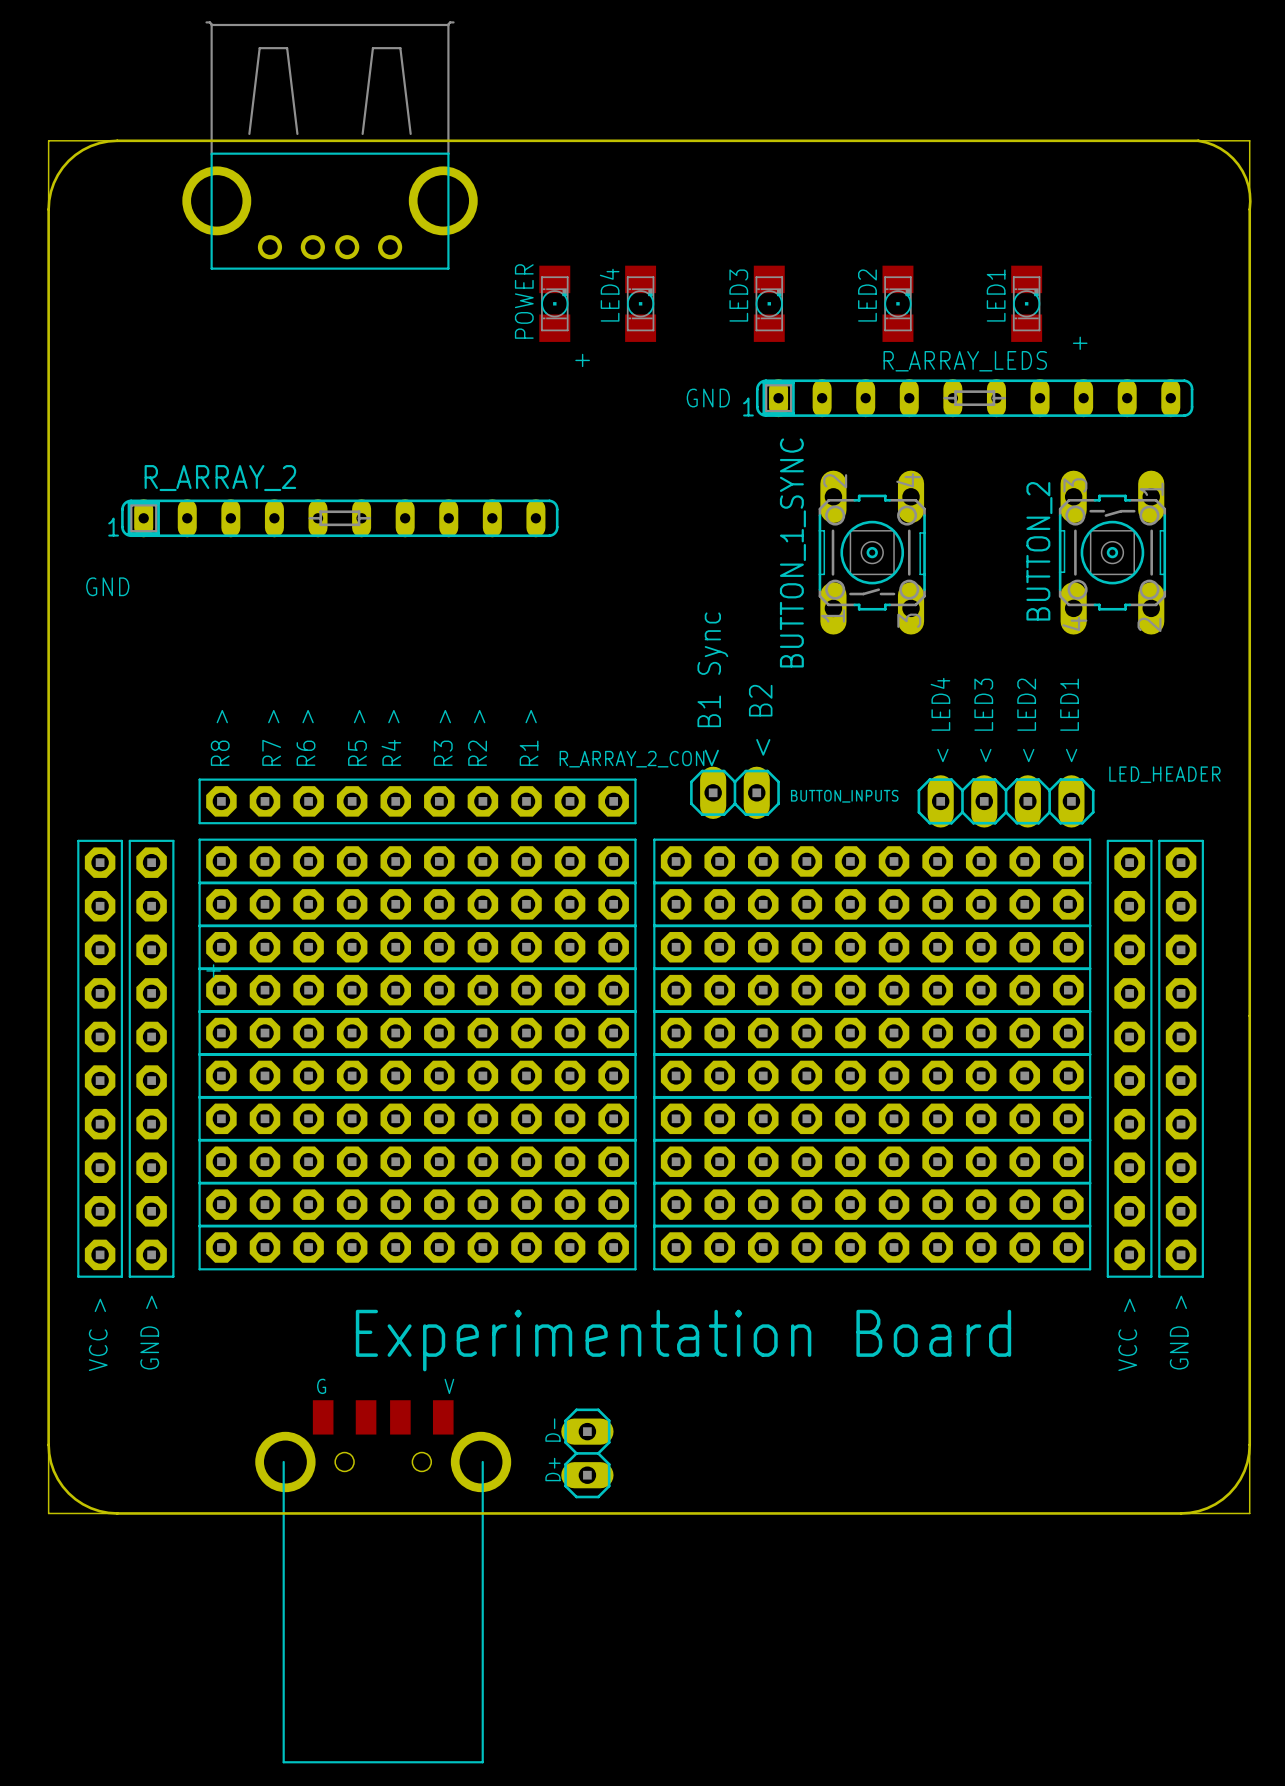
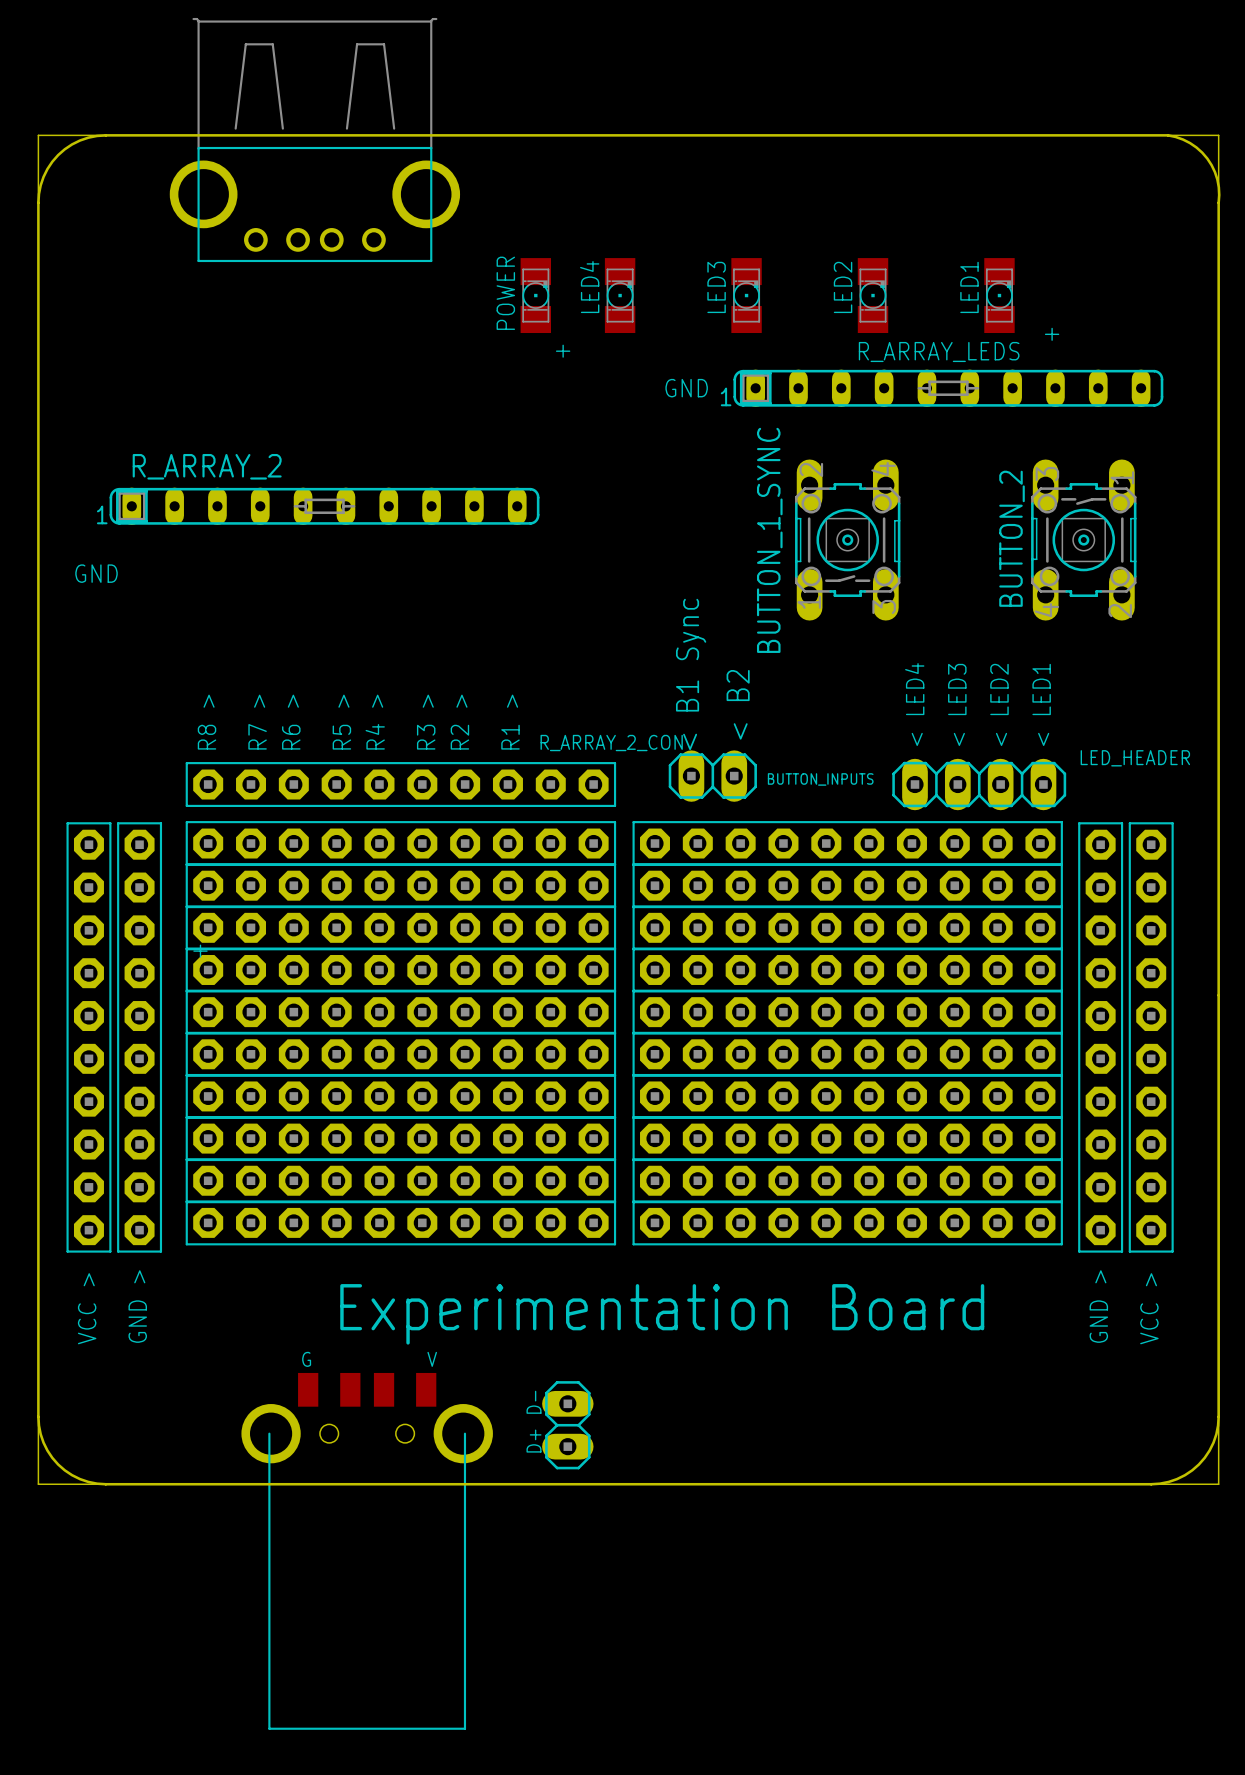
text: GND > (1179, 1332) -> VCC > (1149, 1308)
text: VCC > (1127, 1334) -> GND > (1098, 1306)

